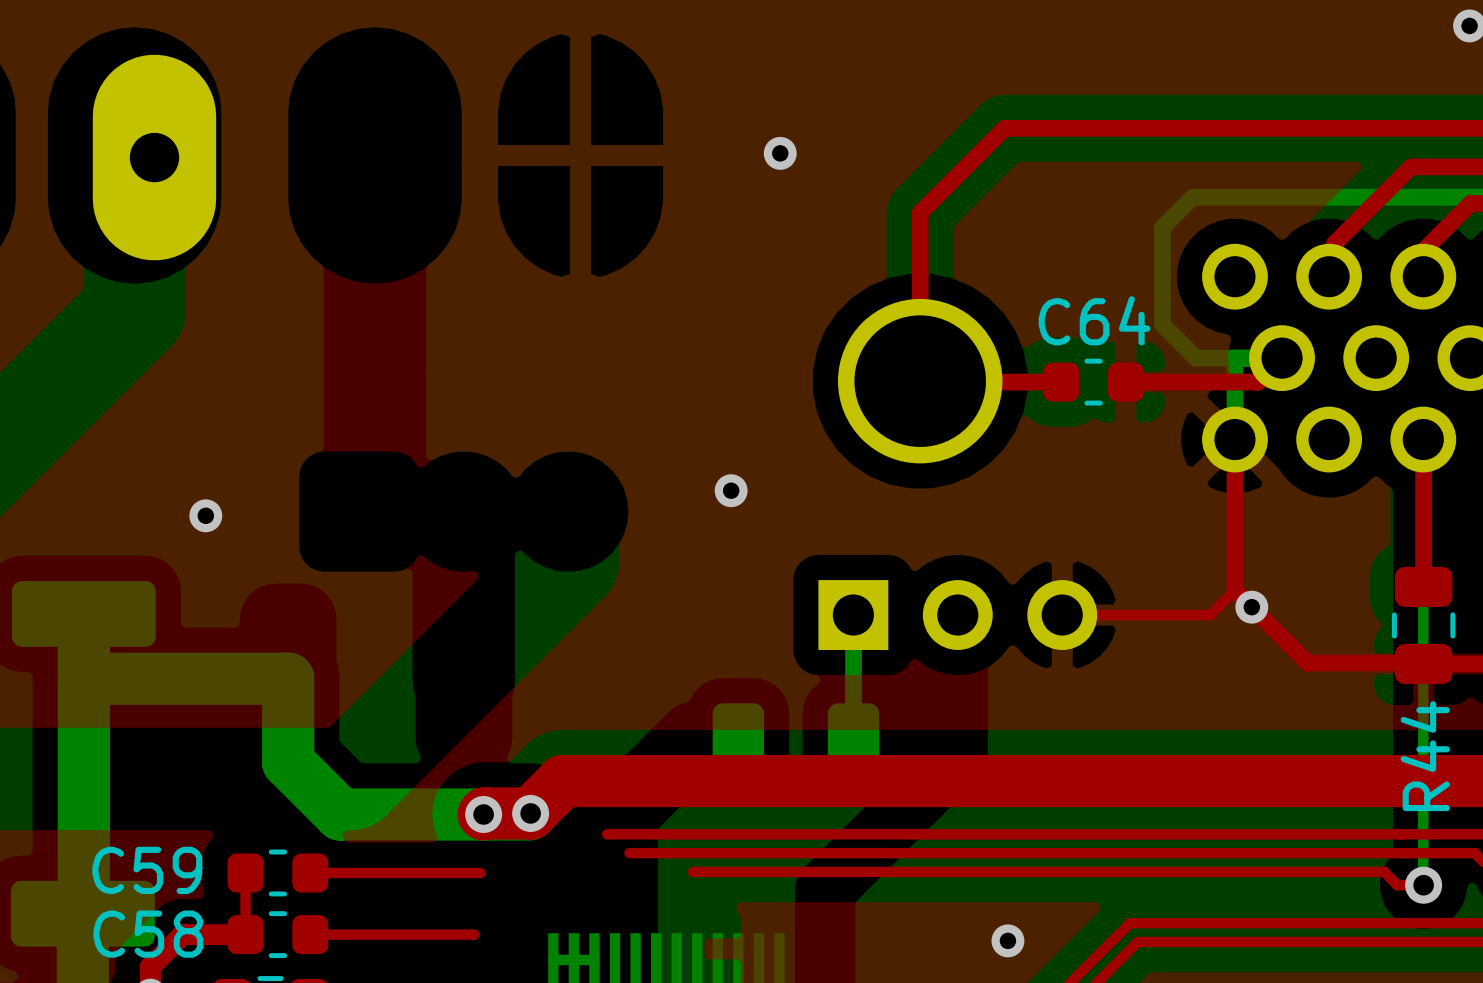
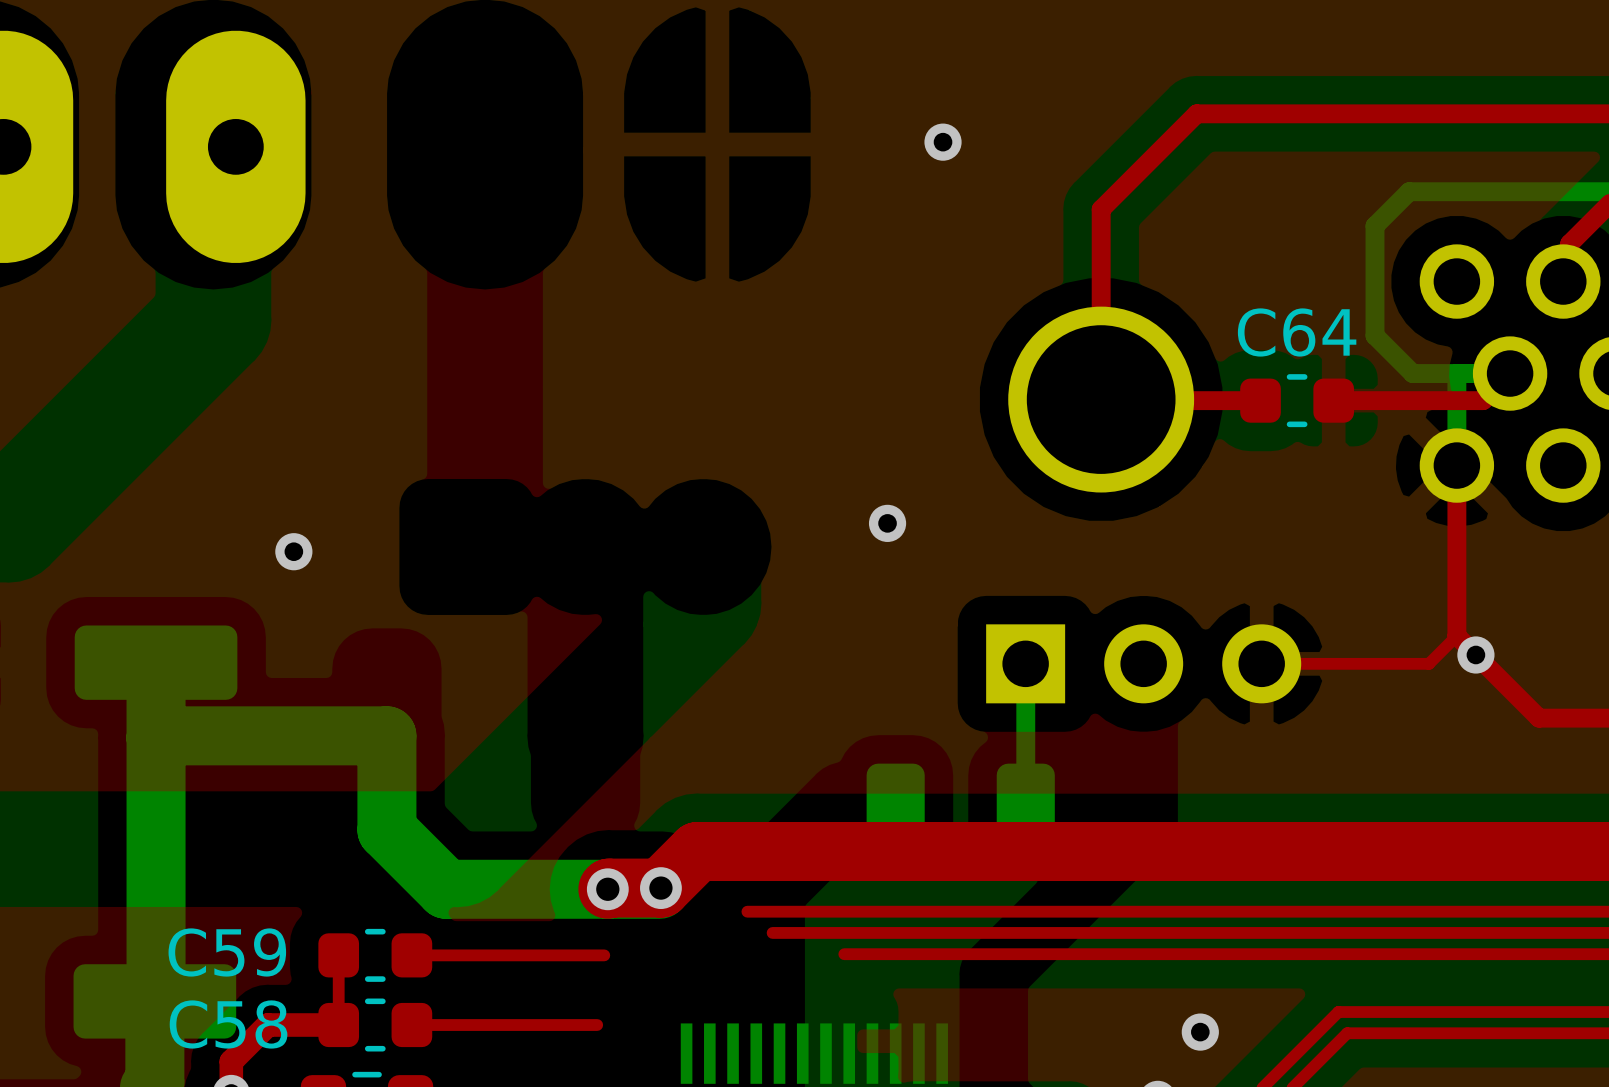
bottom track: (553, 959) (594, 959) -> none

